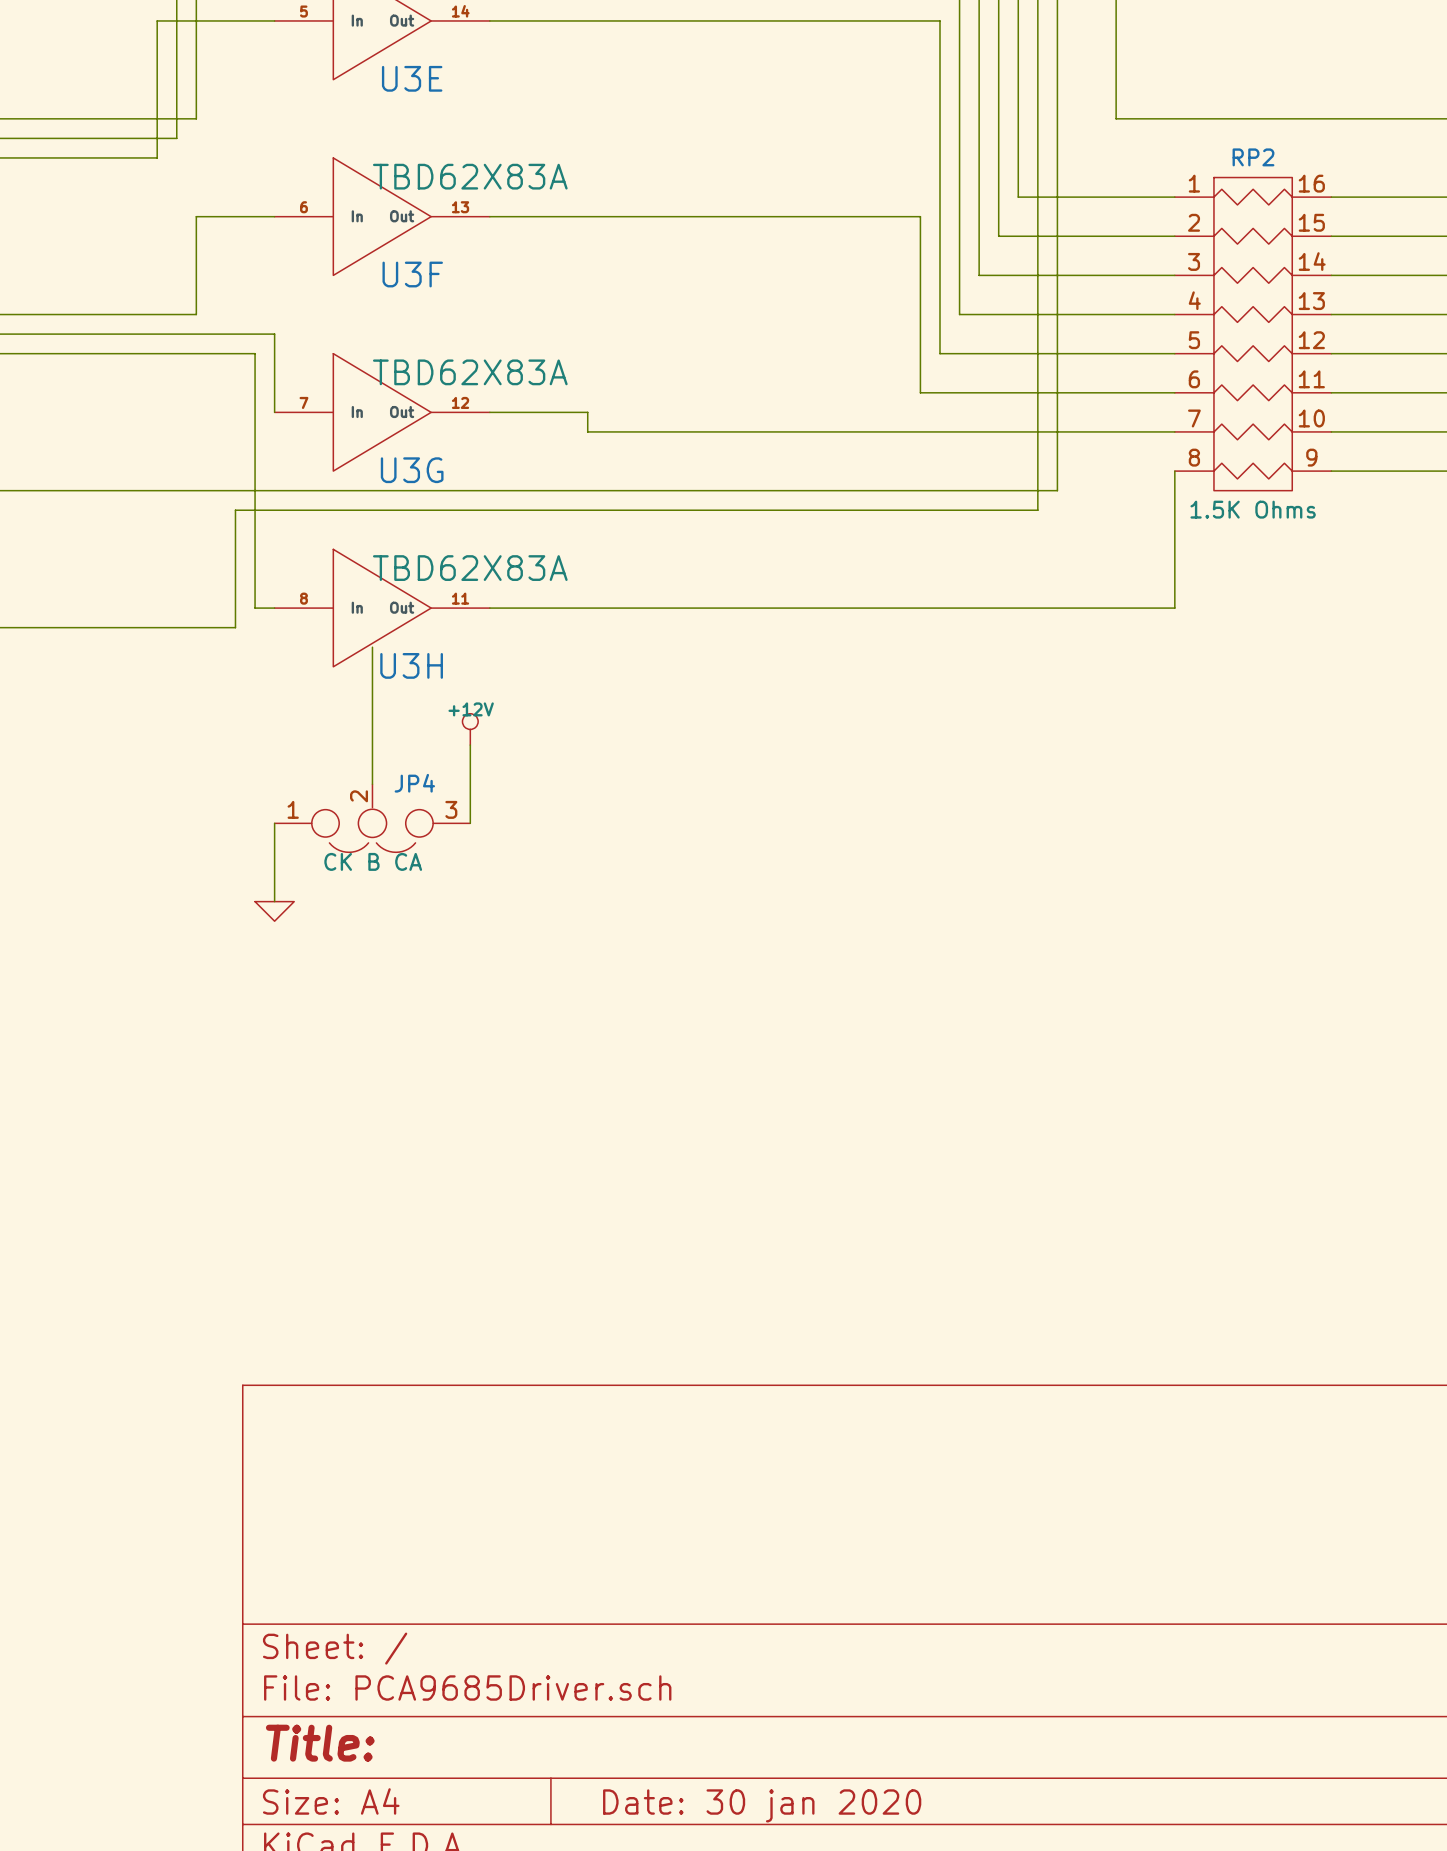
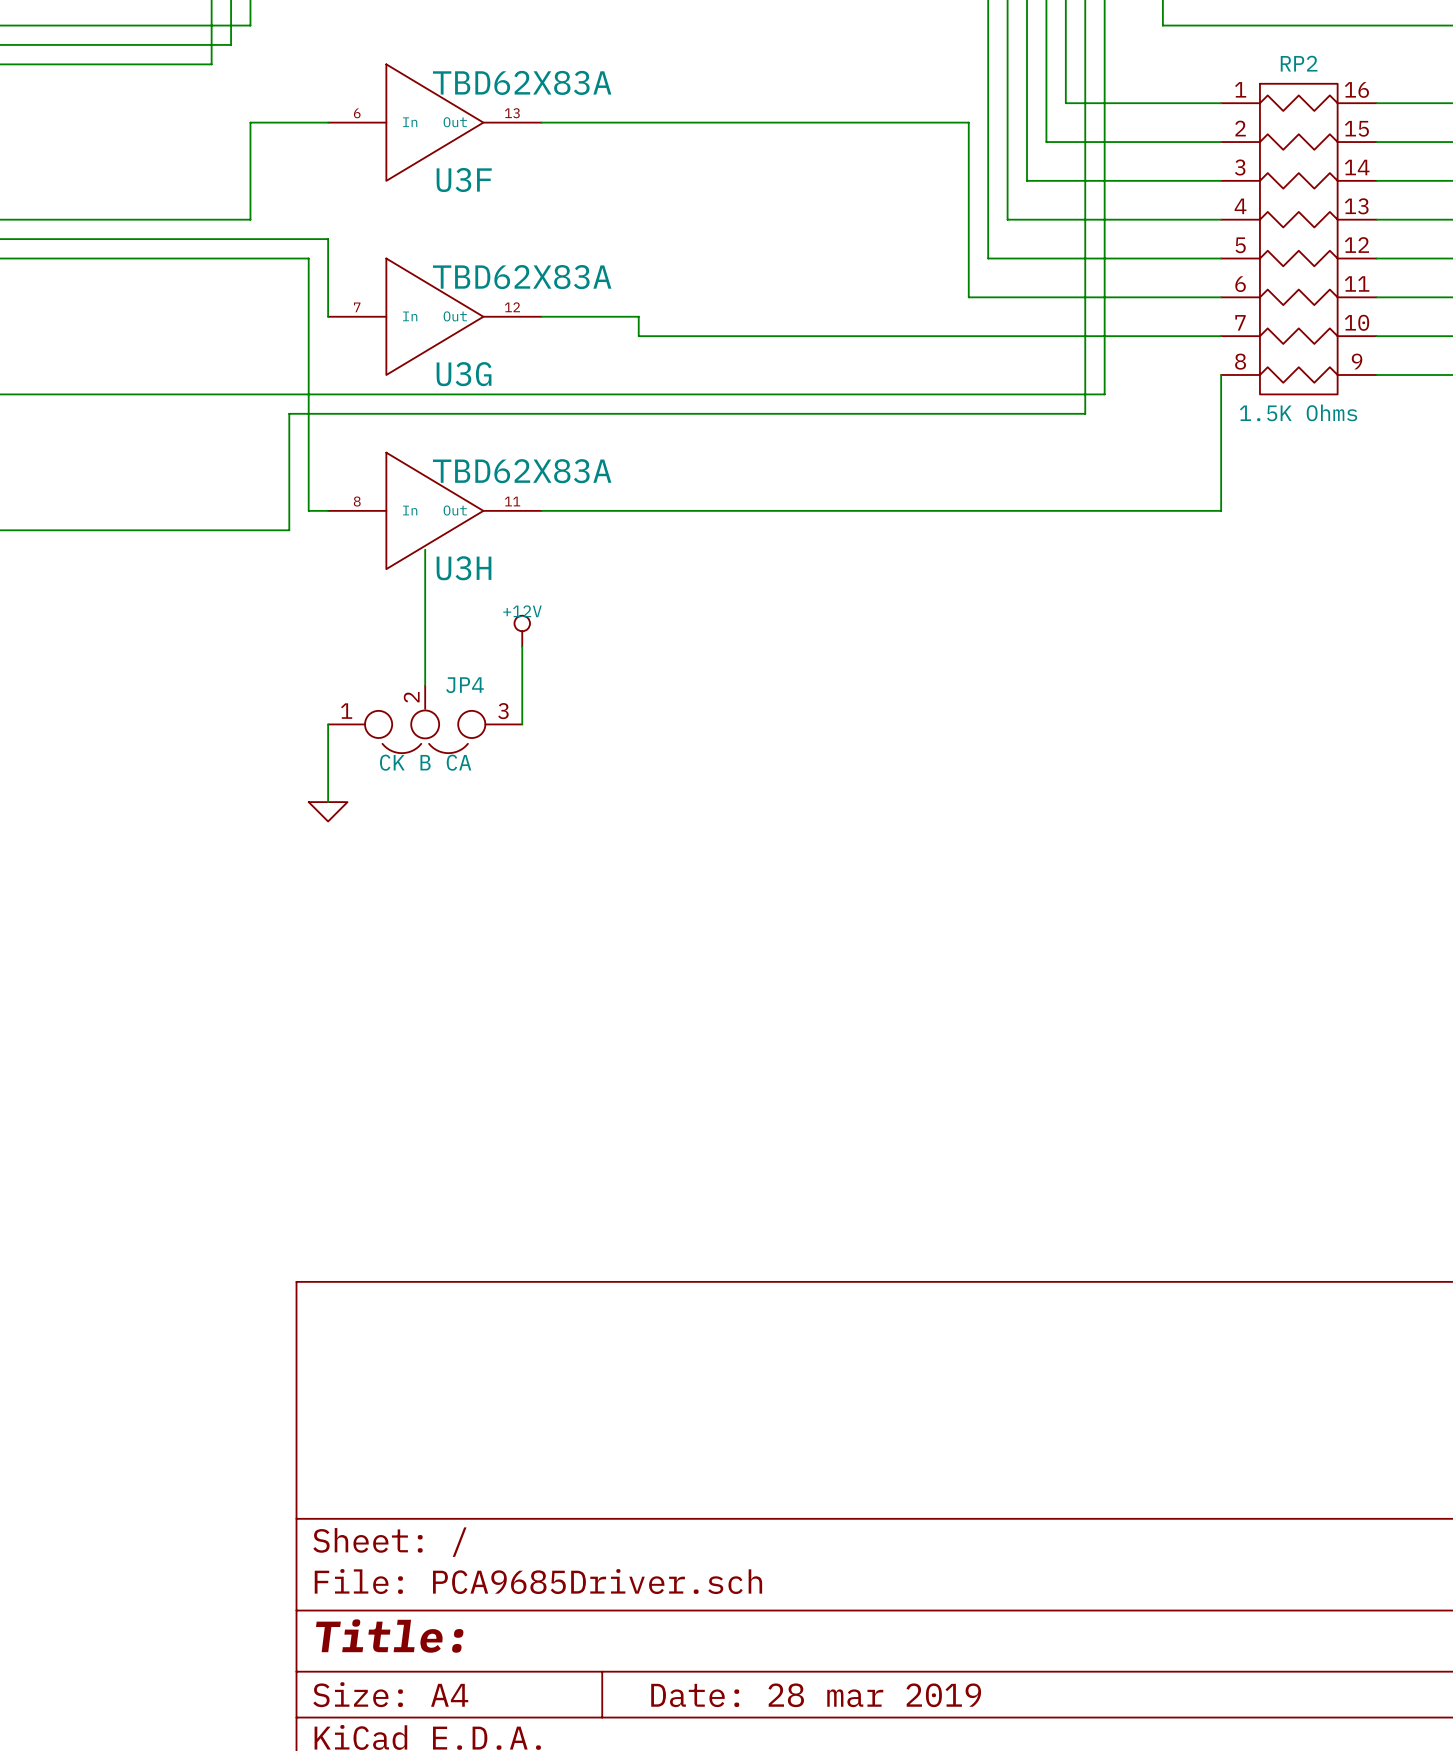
title block: Date: 30 jan 2020 (762, 1805) -> Date: 28 mar 2019 (816, 1695)

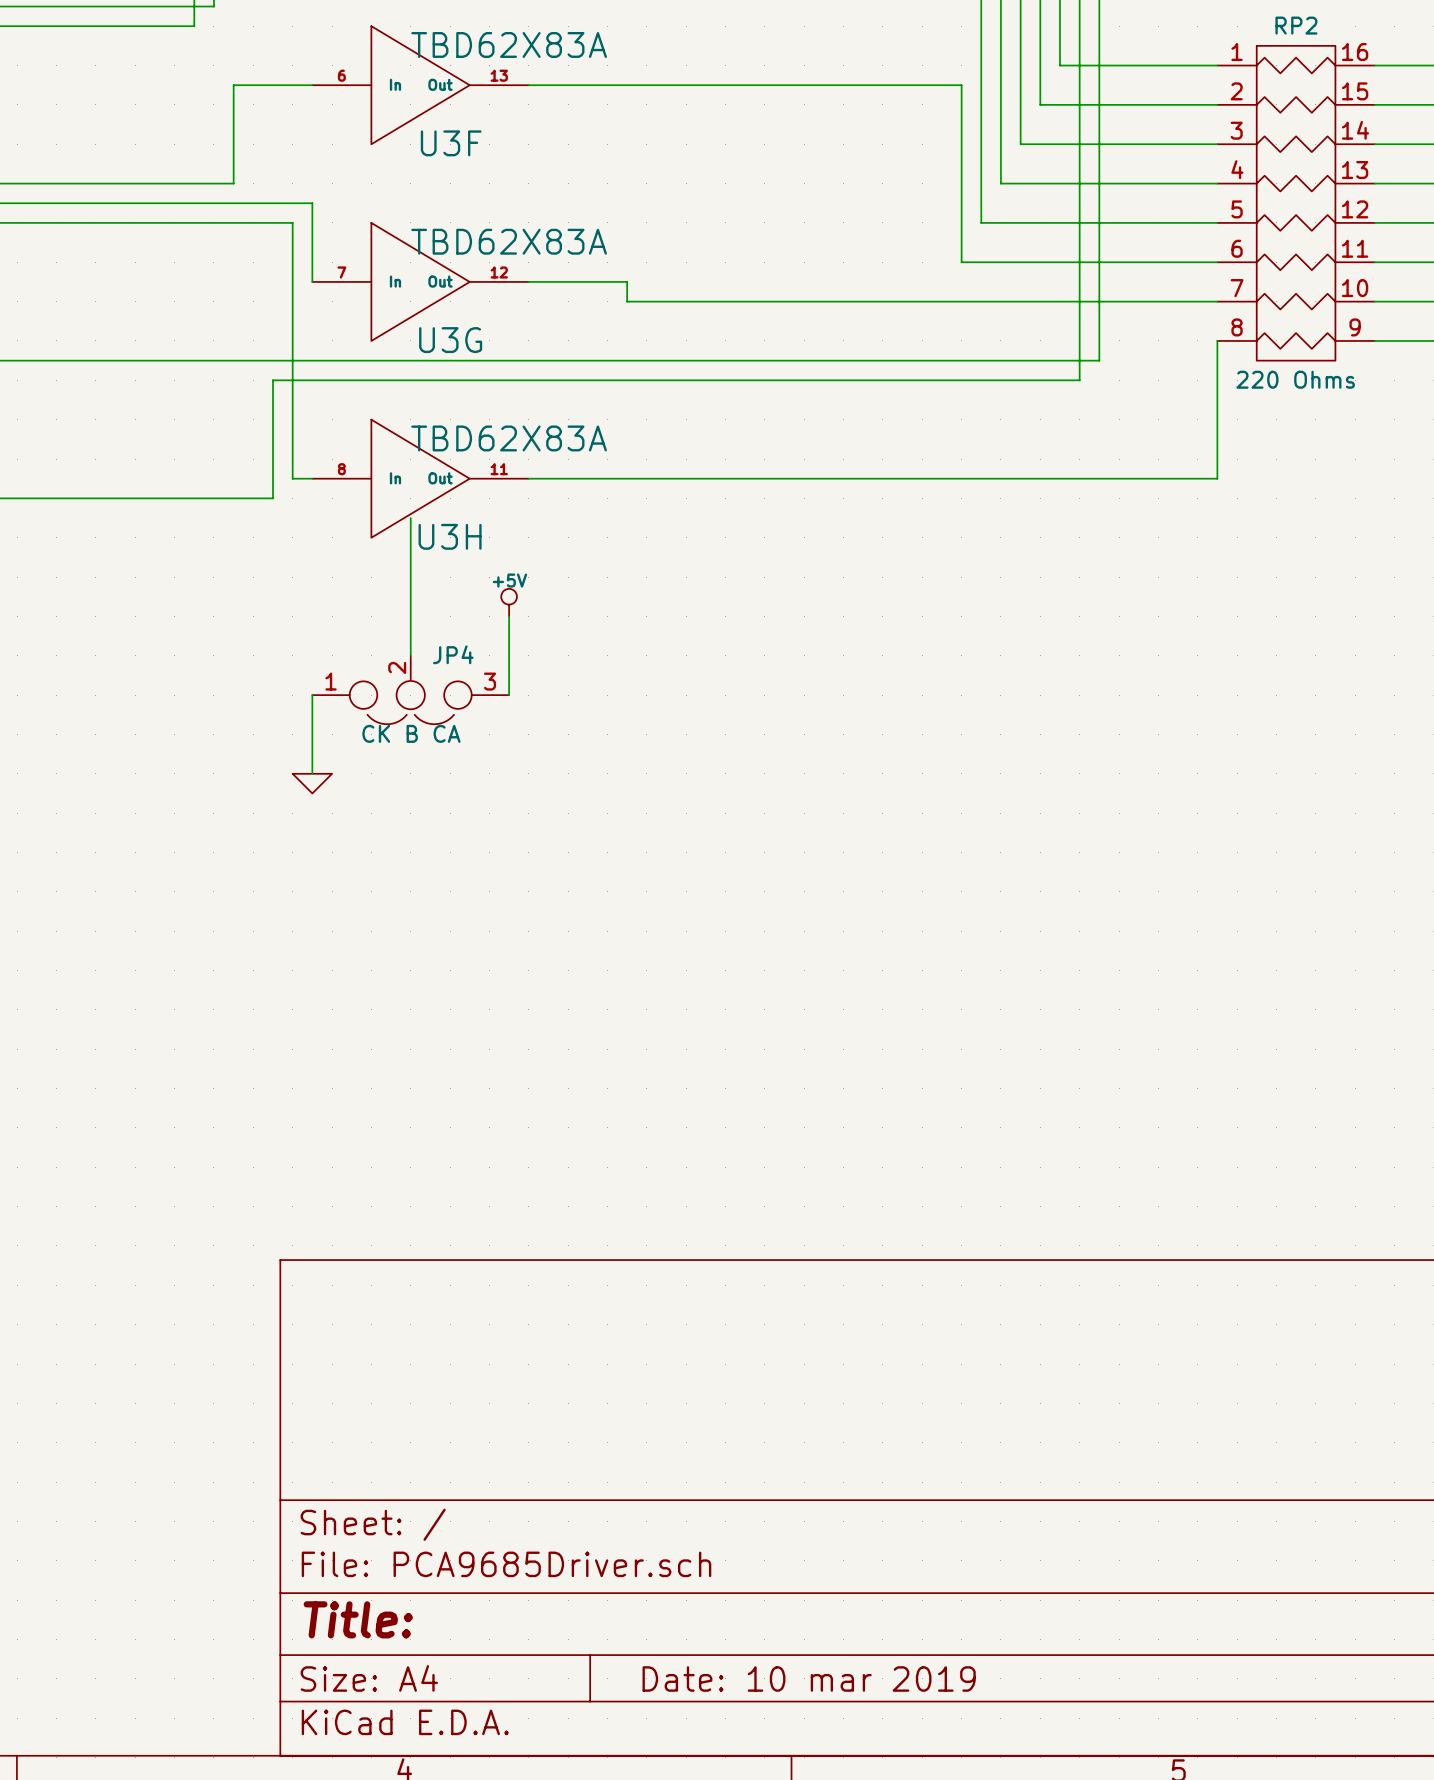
RP2 value: 1.5K Ohms (1298, 412) -> 220 Ohms (1295, 379)
power symbol: +12V (522, 631) -> +5V (509, 602)
title block: Date: 28 mar 2019 (816, 1695) -> Date: 10 mar 2019 (809, 1679)

